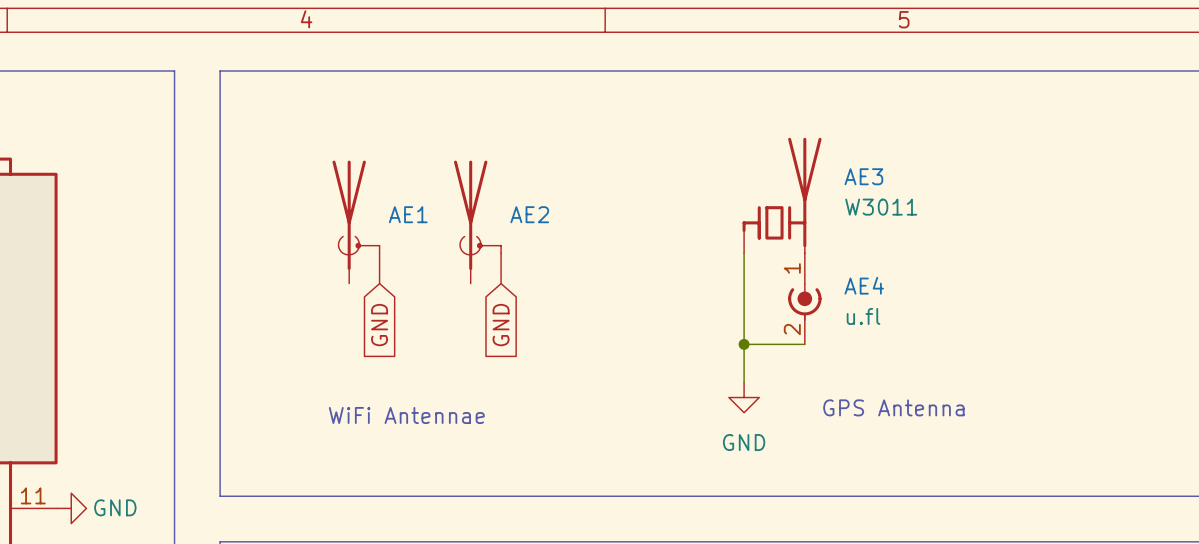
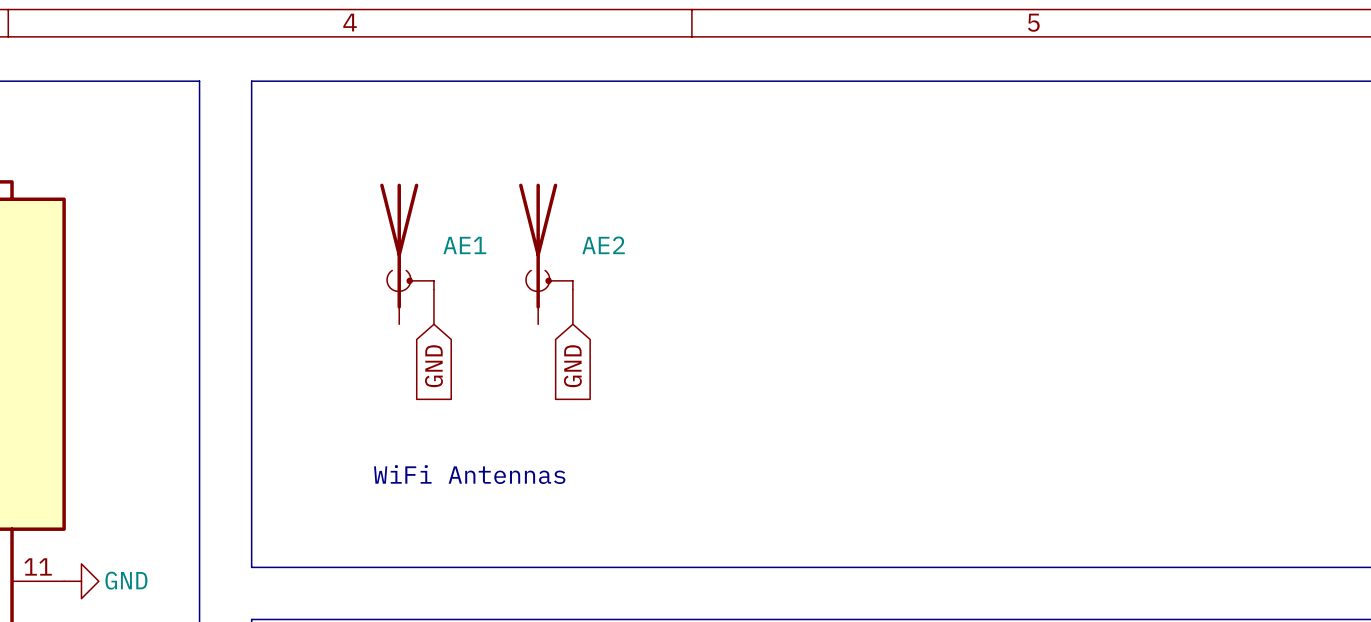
AE3: W3011 (782, 195) -> none
wire: (744, 253) (744, 382) -> none
AE4: u.fl (804, 298) -> none
wire: (744, 344) (804, 344) -> none
junction: (744, 344) -> none
power symbol: GND (744, 397) -> none
text: GPS Antenna (893, 407) -> none
text: WiFi Antennae (406, 415) -> WiFi Antennas (469, 474)

